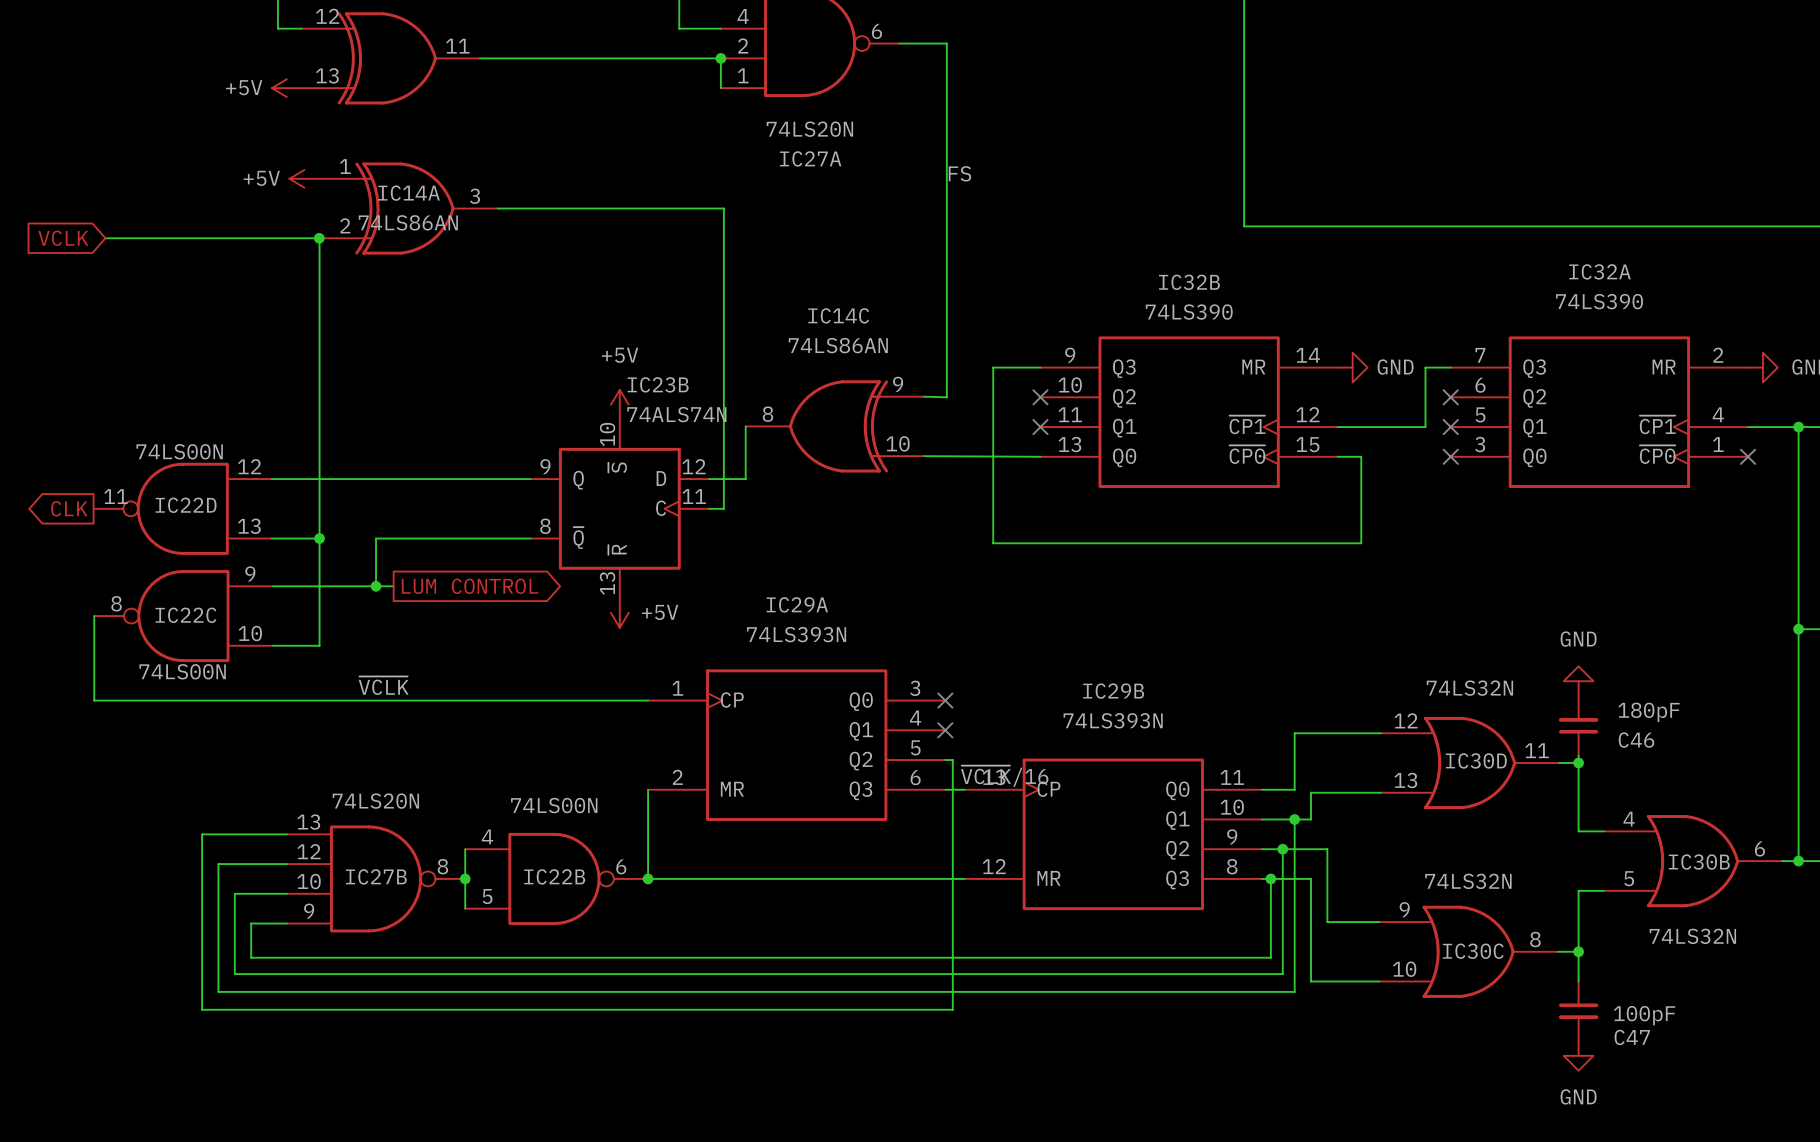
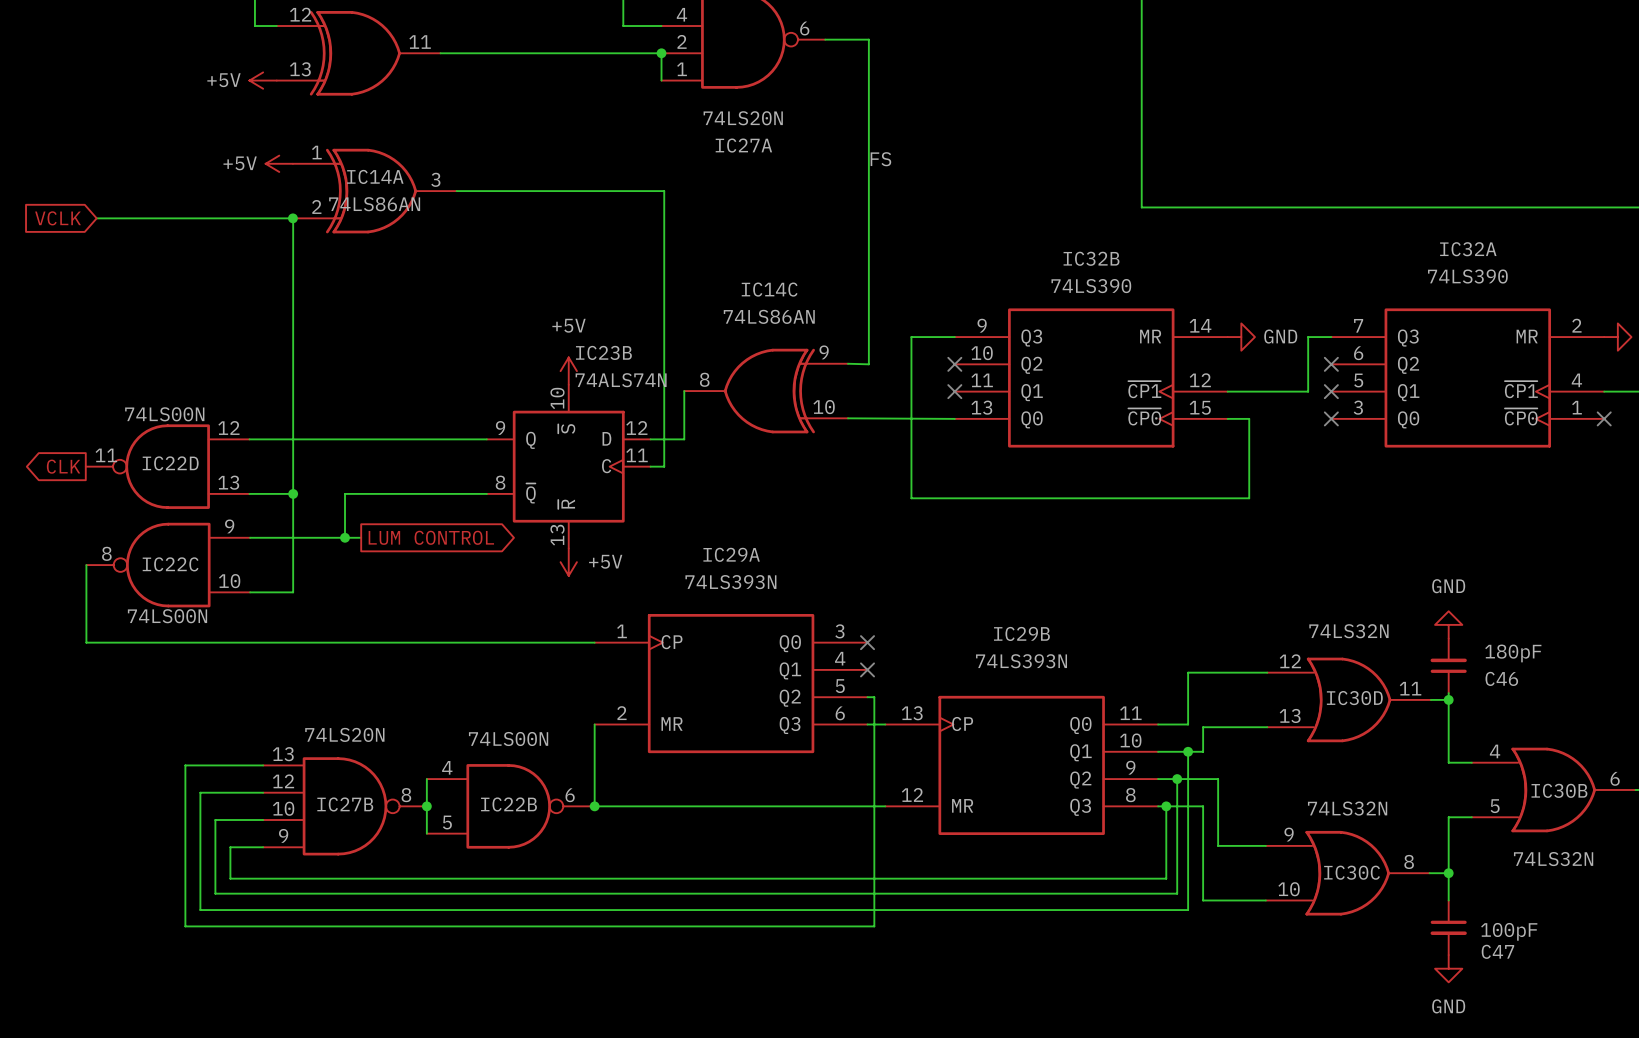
label: ~{VCLK} (383, 685) -> none
label: ~{VCLK}/16 (1004, 776) -> none

